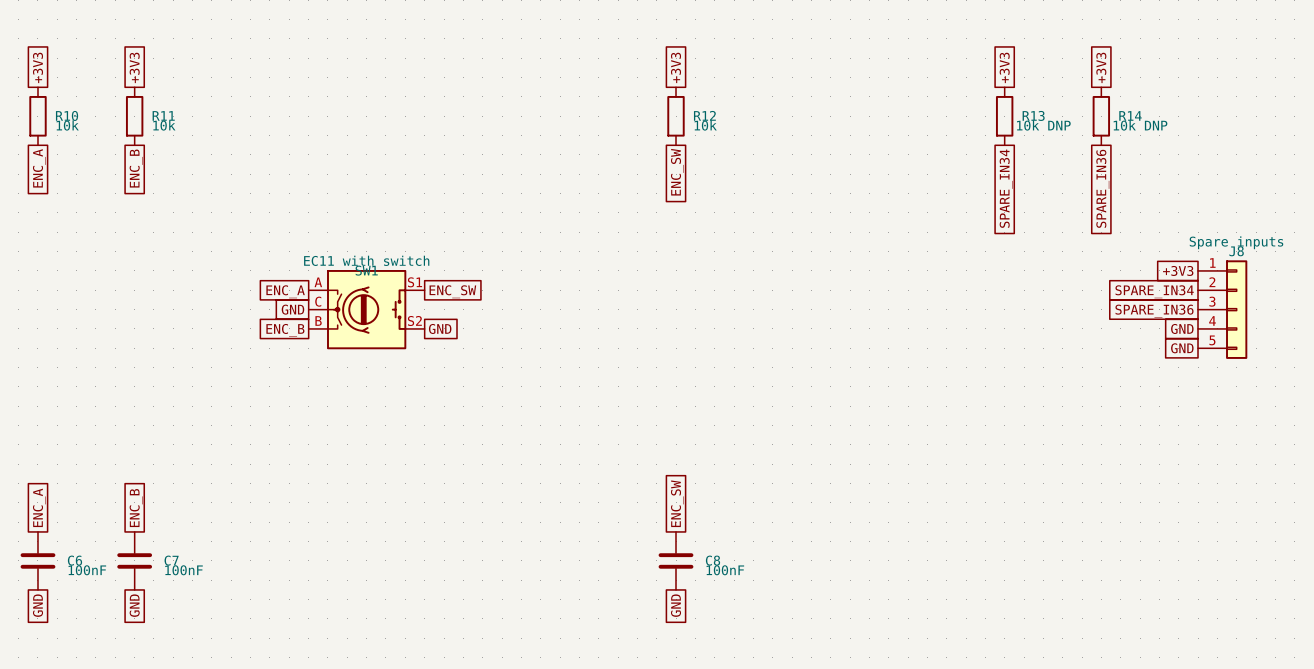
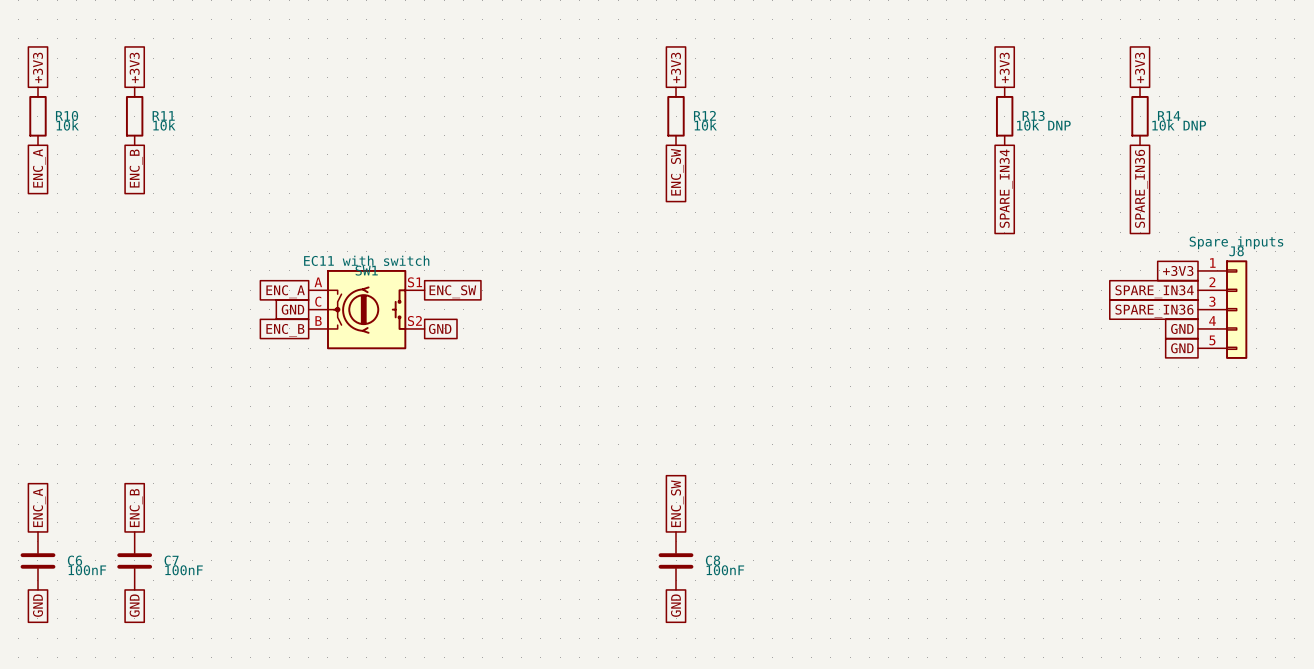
global label position: +3V3 (1101, 67) -> +3V3 (1140, 67)
R14 position: (1101, 116) -> (1140, 116)
global label position: SPARE_IN36 (1102, 188) -> SPARE_IN36 (1141, 188)

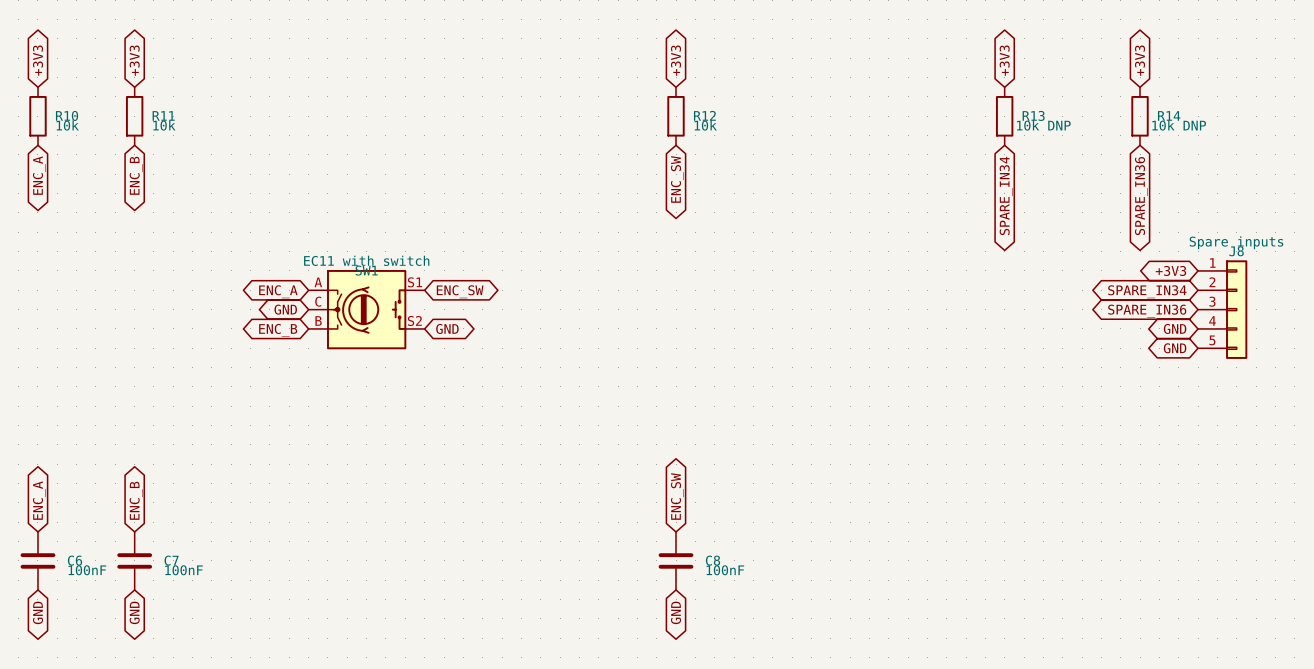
global label shape: passive (38, 67) -> bidirectional (38, 60)
global label shape: passive (134, 67) -> bidirectional (134, 60)
global label shape: passive (676, 67) -> bidirectional (676, 60)
global label shape: passive (1004, 67) -> bidirectional (1004, 60)
global label shape: passive (1140, 67) -> bidirectional (1140, 60)
global label shape: passive (39, 168) -> bidirectional (39, 175)
global label shape: passive (136, 168) -> bidirectional (136, 175)
global label shape: passive (677, 172) -> bidirectional (677, 179)
global label shape: passive (1006, 188) -> bidirectional (1006, 195)
global label shape: passive (1141, 188) -> bidirectional (1141, 196)
global label shape: passive (1178, 270) -> bidirectional (1170, 270)
global label shape: passive (285, 291) -> bidirectional (278, 291)
global label shape: passive (452, 291) -> bidirectional (460, 291)
global label shape: passive (1154, 291) -> bidirectional (1147, 291)
global label shape: passive (292, 309) -> bidirectional (285, 309)
global label shape: passive (1154, 311) -> bidirectional (1147, 311)
global label shape: passive (440, 328) -> bidirectional (447, 328)
global label shape: passive (1182, 328) -> bidirectional (1175, 328)
global label shape: passive (285, 330) -> bidirectional (278, 330)
global label shape: passive (1182, 348) -> bidirectional (1175, 348)
global label shape: passive (677, 503) -> bidirectional (677, 496)
global label shape: passive (39, 507) -> bidirectional (39, 500)
global label shape: passive (136, 508) -> bidirectional (136, 500)
global label shape: passive (38, 605) -> bidirectional (38, 612)
global label shape: passive (134, 605) -> bidirectional (134, 612)
global label shape: passive (676, 605) -> bidirectional (676, 612)

